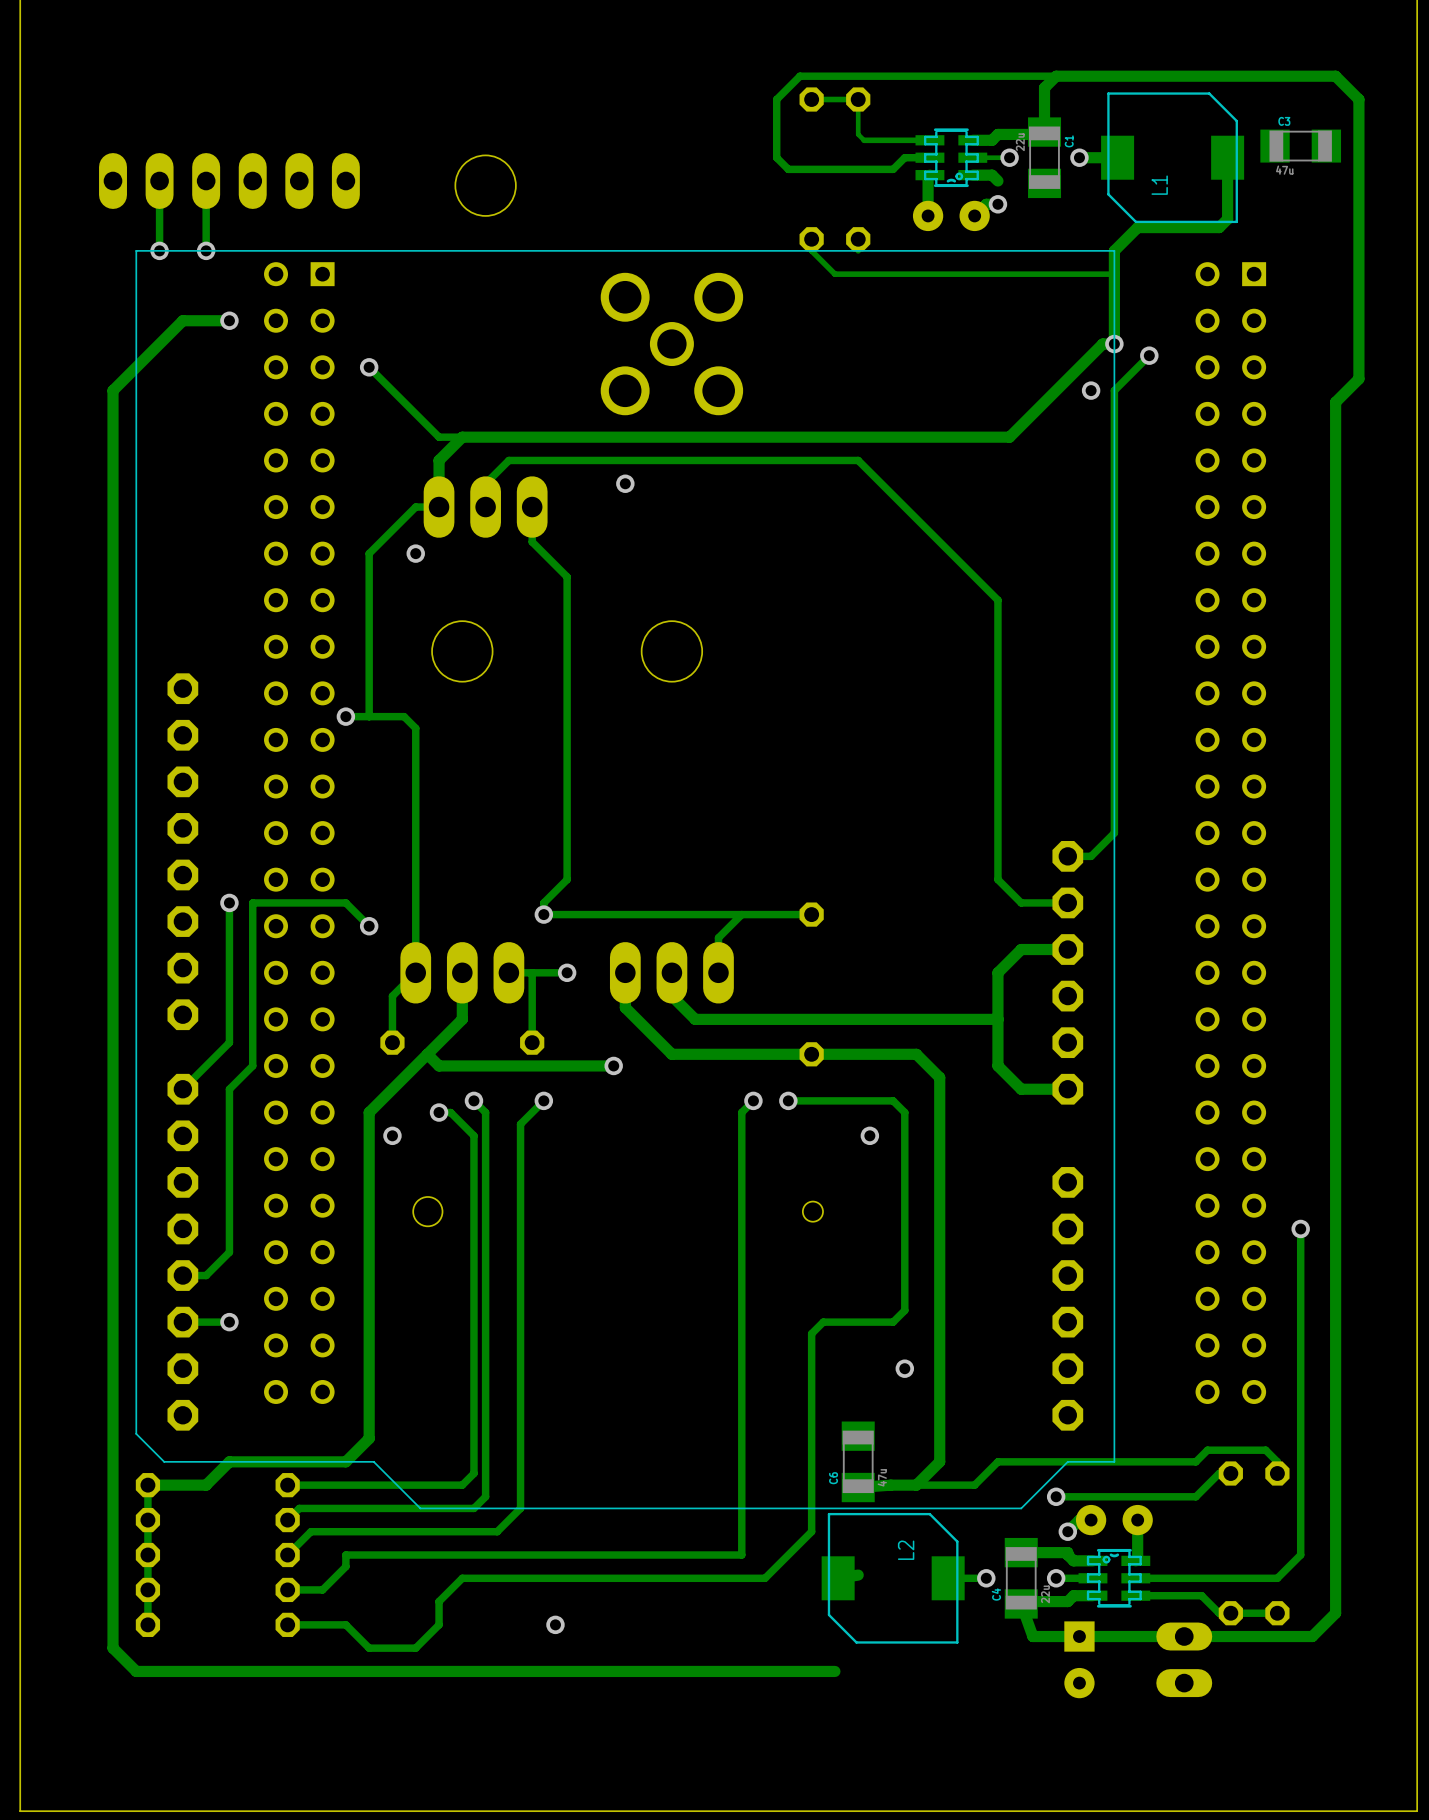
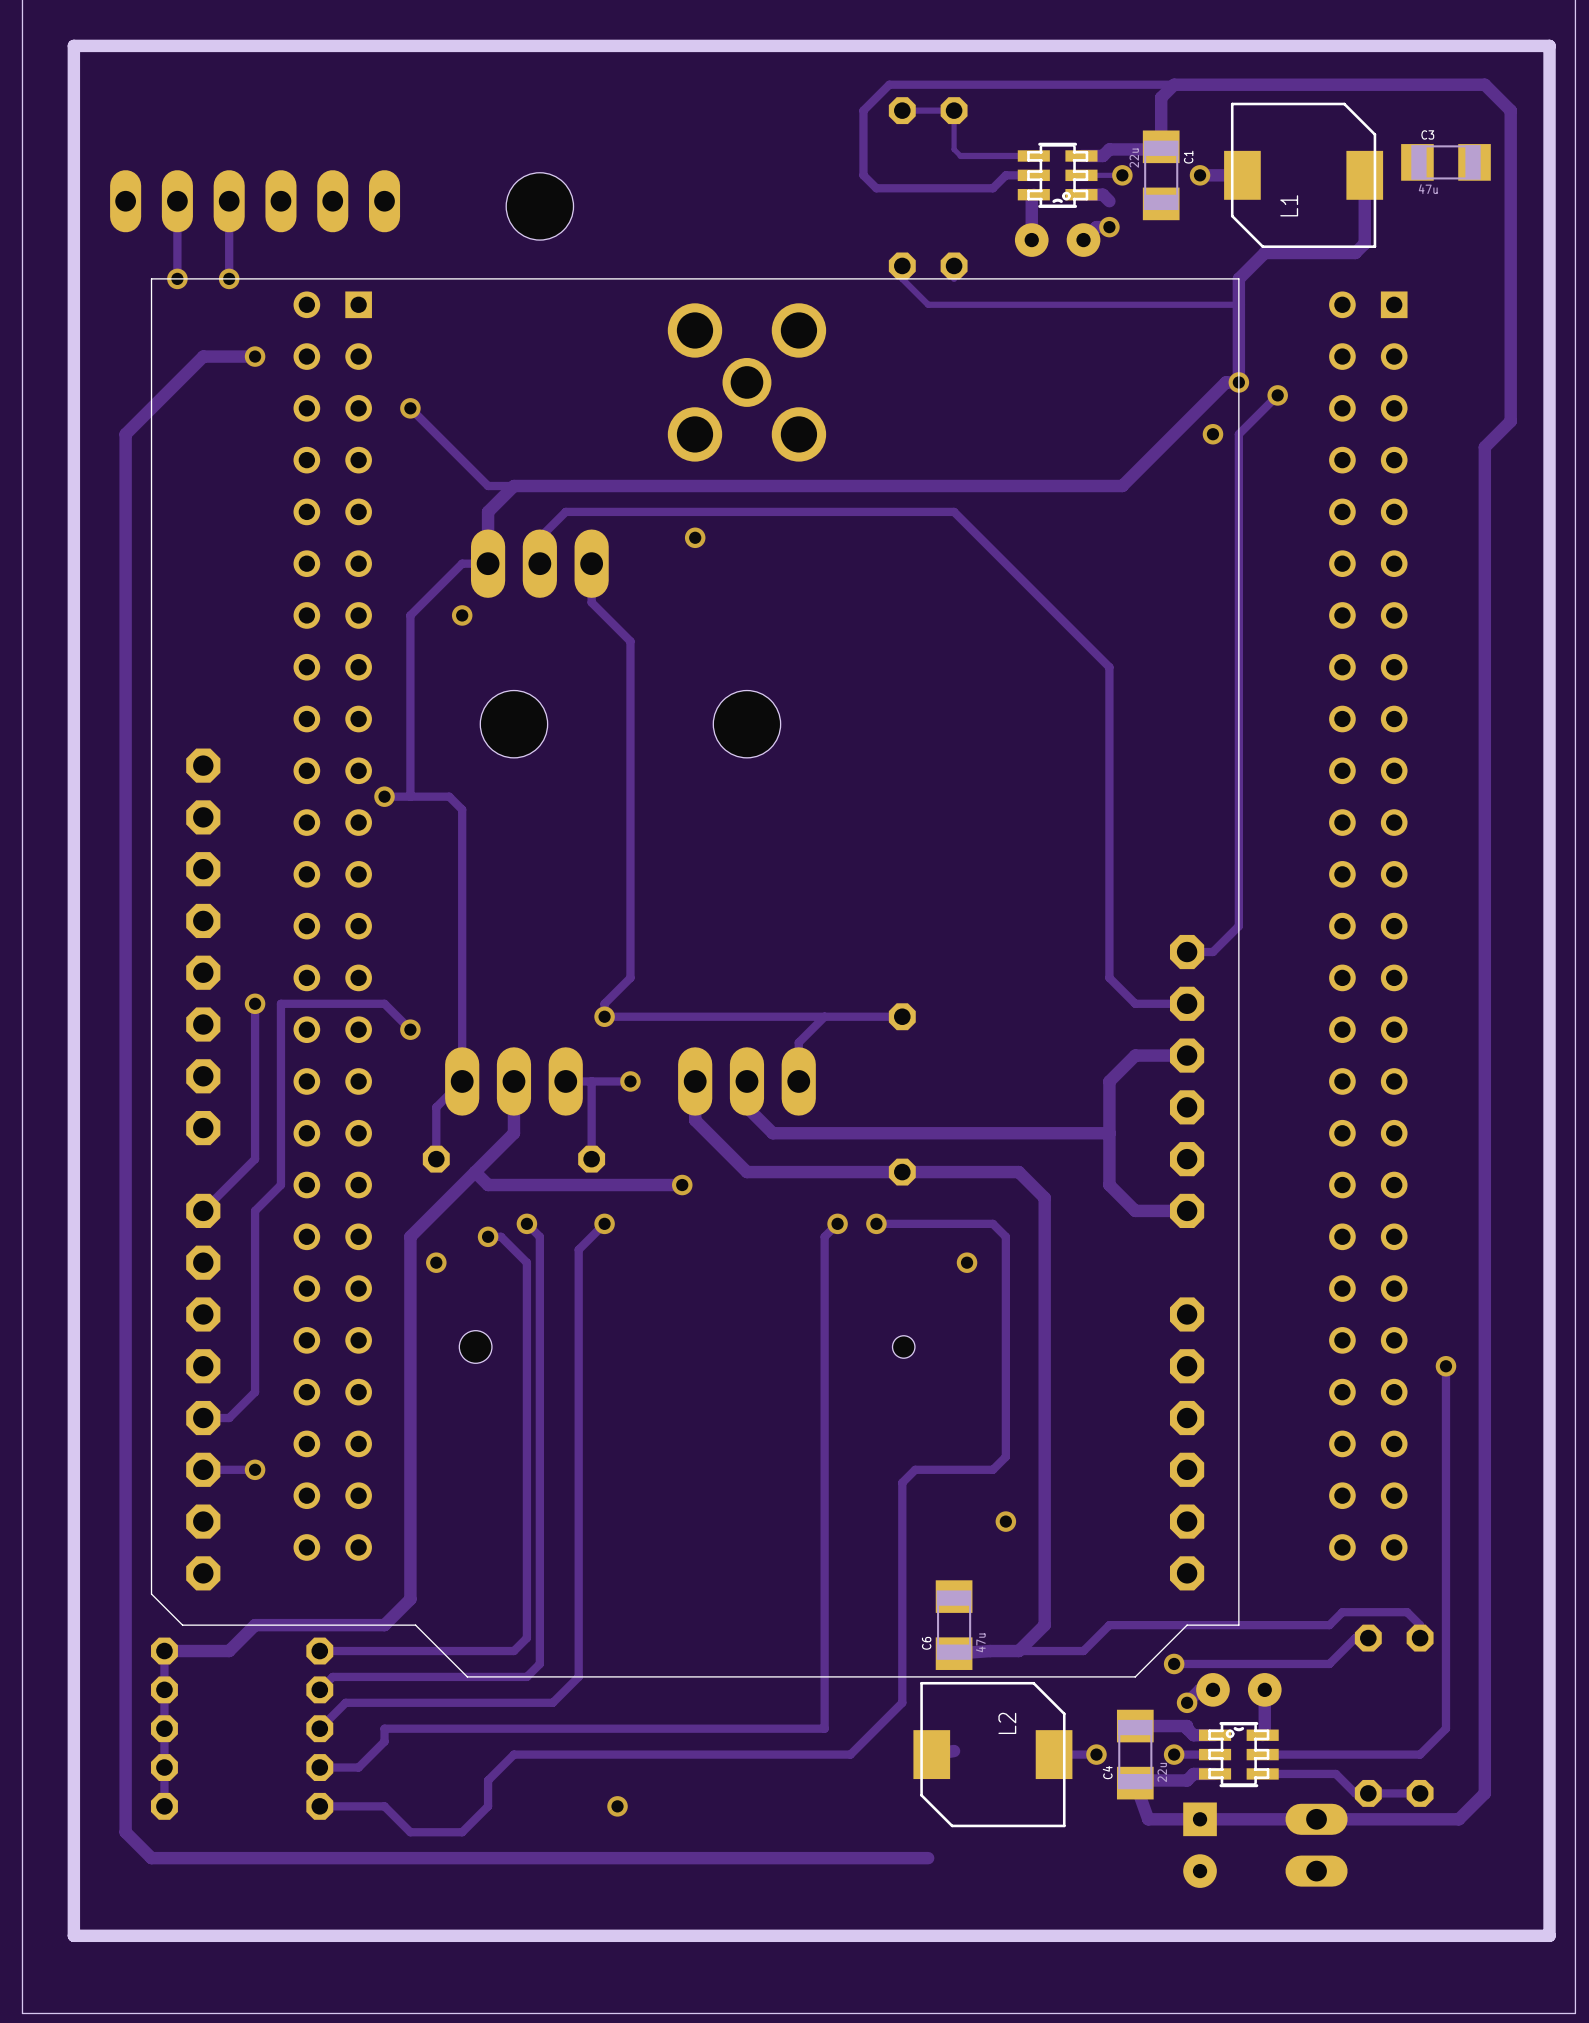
board edge: none -> (1549, 45) (73, 45) (73, 1935) (1549, 1935) (1549, 45)

